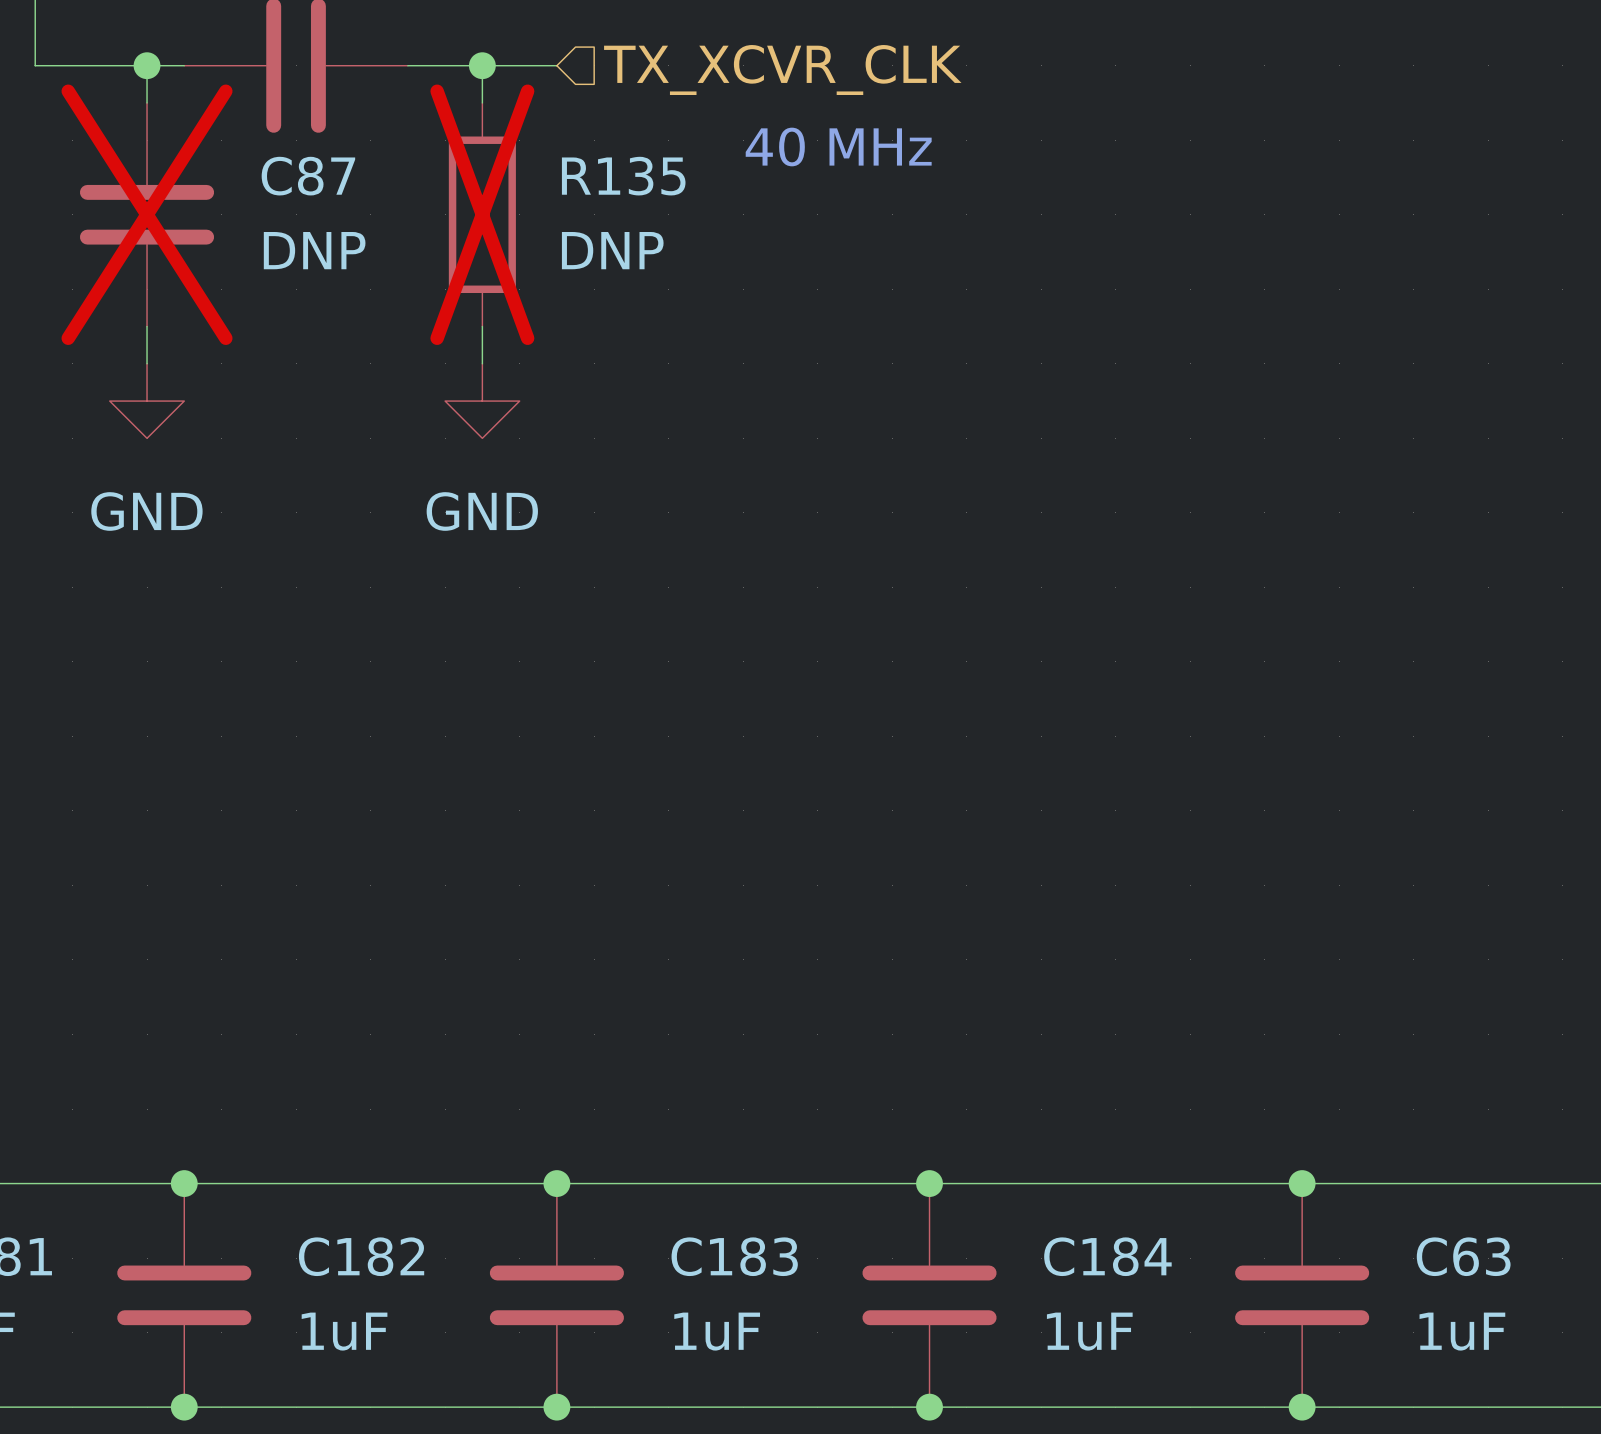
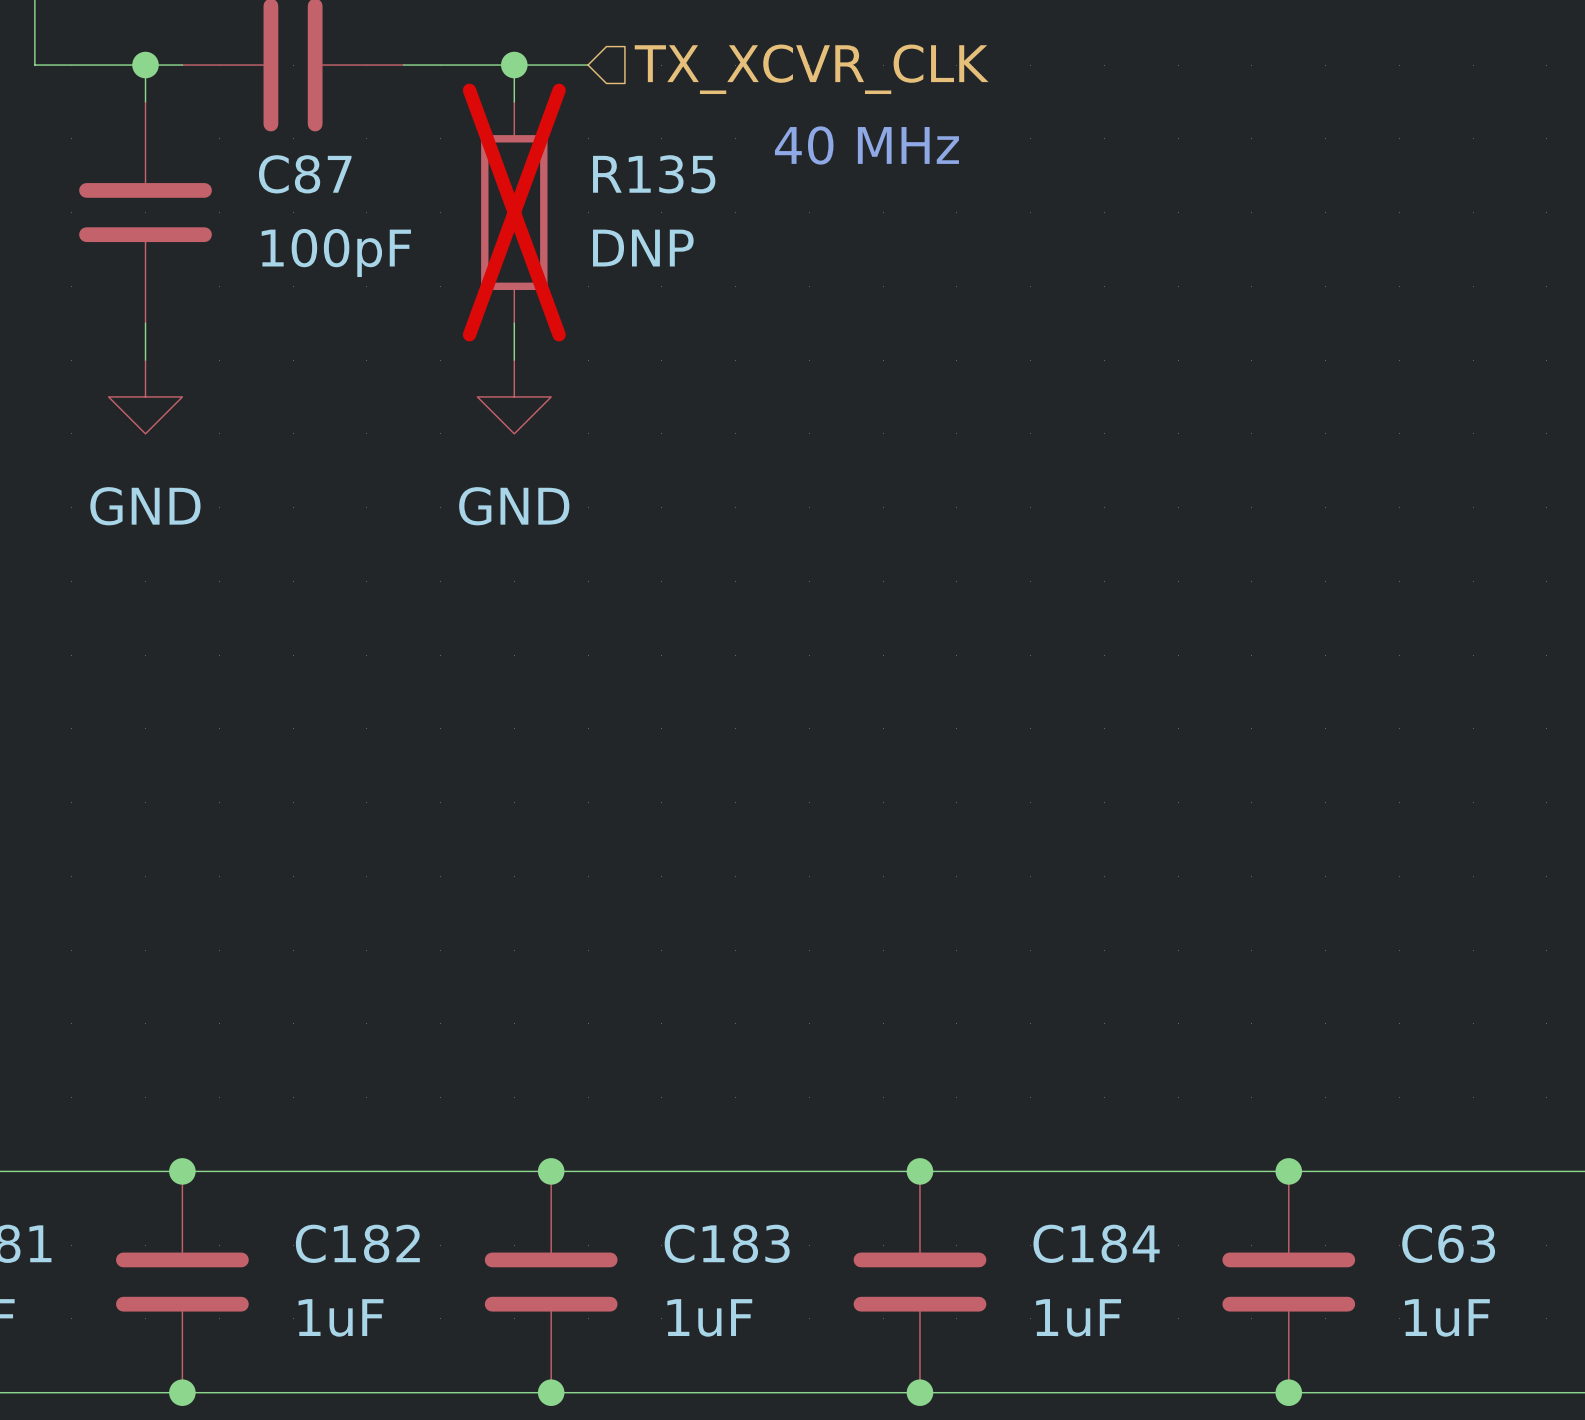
wire: (482, 65) (482, 102) -> (514, 65) (514, 101)
junction position: (482, 65) -> (514, 65)
wire: none -> (551, 65) (588, 65)
hierarchical label position: TX_XCVR_CLK (782, 70) -> TX_XCVR_CLK (811, 69)
text position: 40 MHz (838, 146) -> 40 MHz (866, 145)
C87 do-not-place cross: (147, 214) -> none
R135 position: (482, 214) -> (514, 212)
C87 value: DNP (314, 250) -> 100pF (336, 252)
wire: (482, 326) (482, 363) -> (514, 323) (514, 360)
power symbol position: GND (482, 401) -> GND (514, 396)

